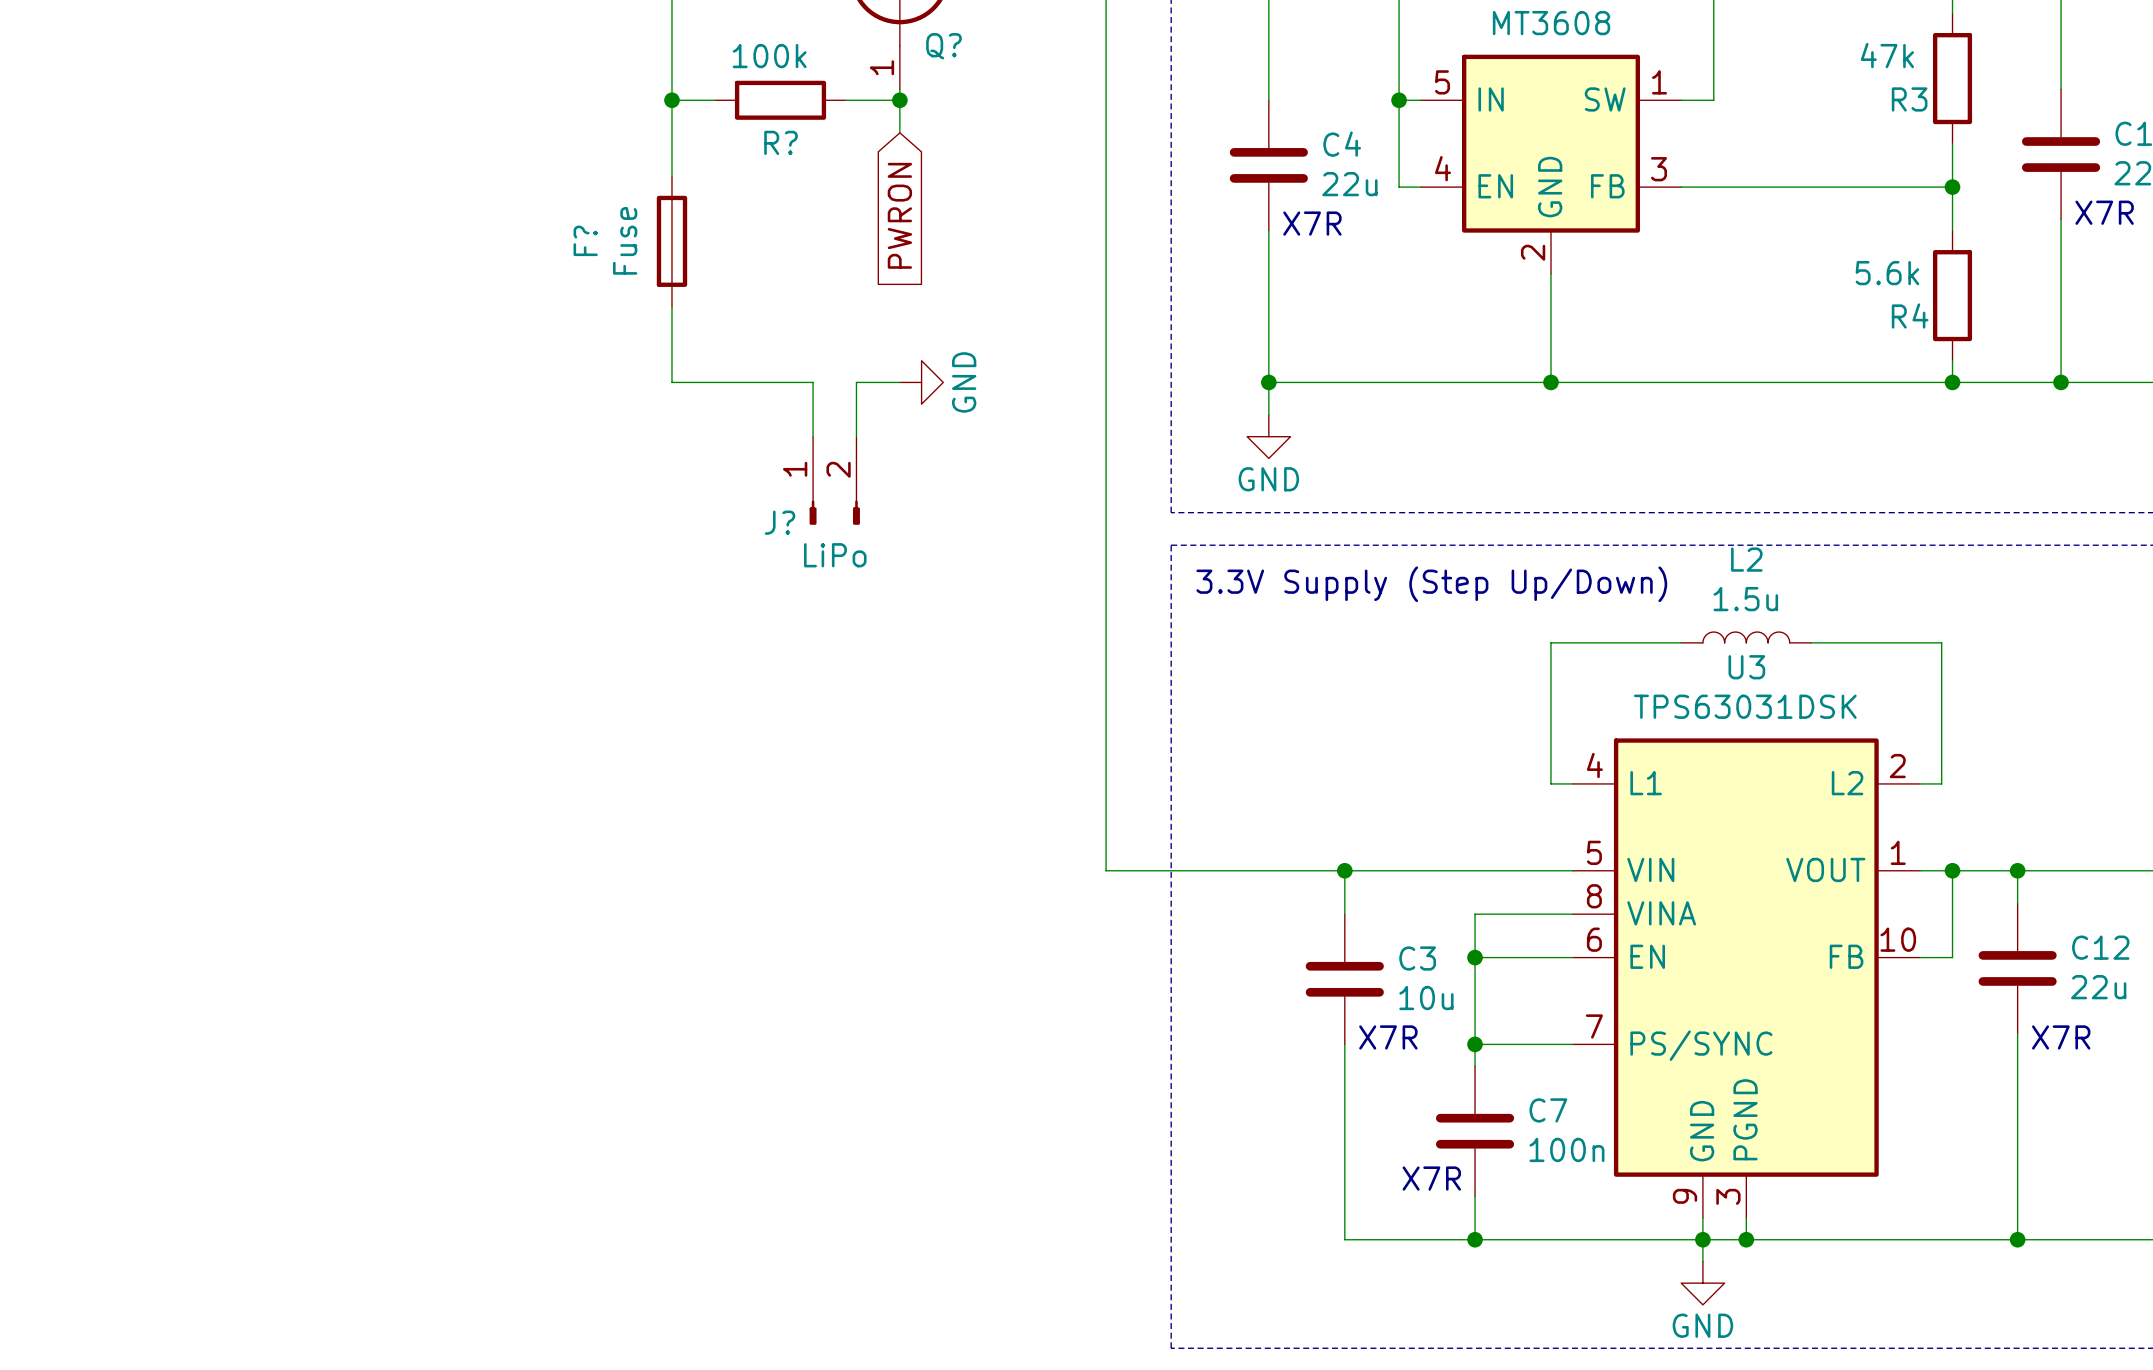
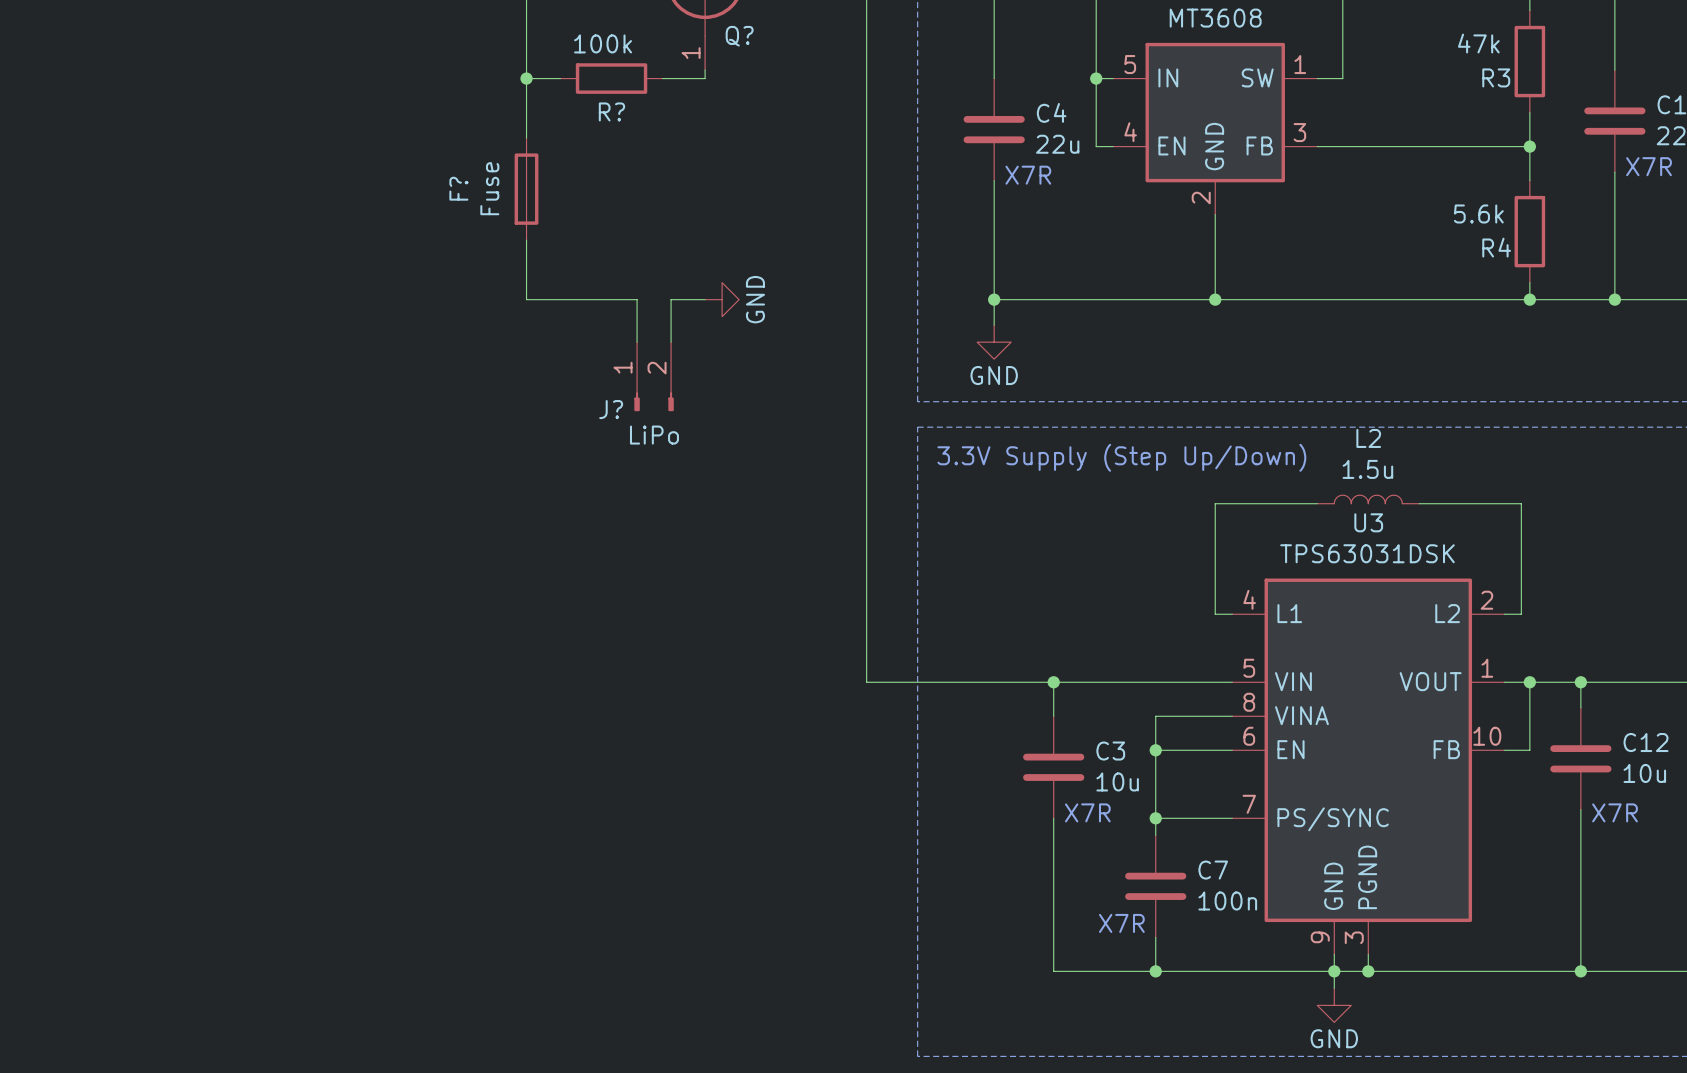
wire: (899, 100) (899, 132) -> none
junction: (899, 100) -> none
global label: PWRON (899, 215) -> none
C12 value: 22u (2098, 987) -> 10u (1644, 773)

